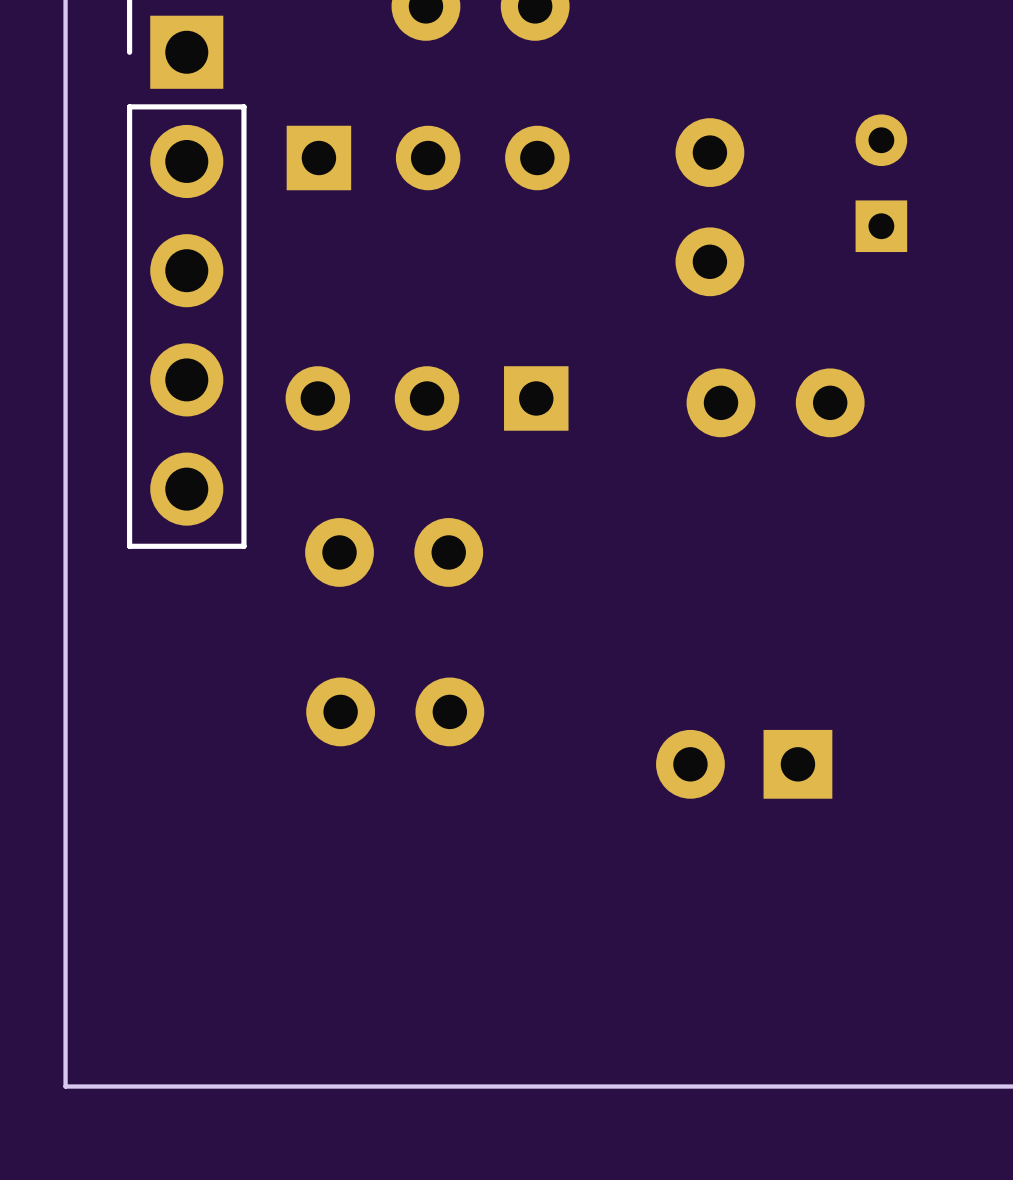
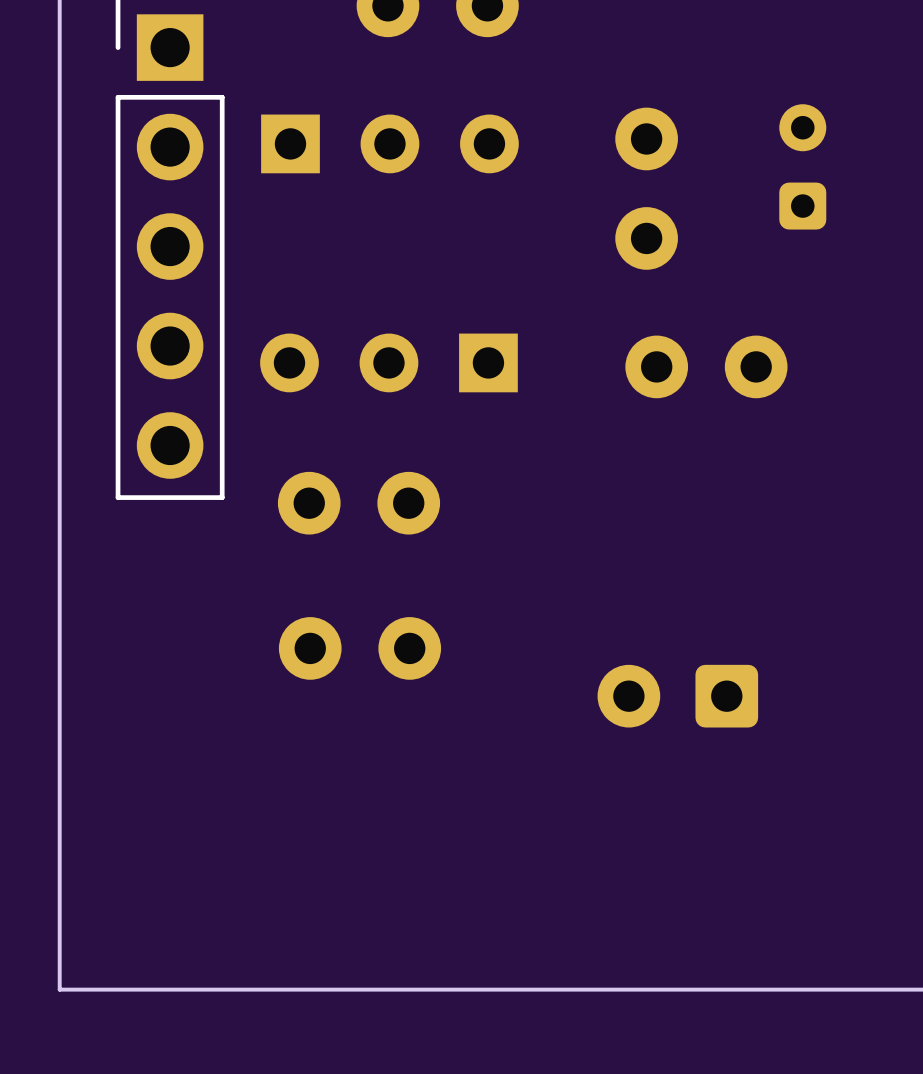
part footprint: [855, 114, 908, 253] -> [779, 104, 827, 230]
part footprint: [656, 729, 833, 799] -> [597, 664, 759, 728]

